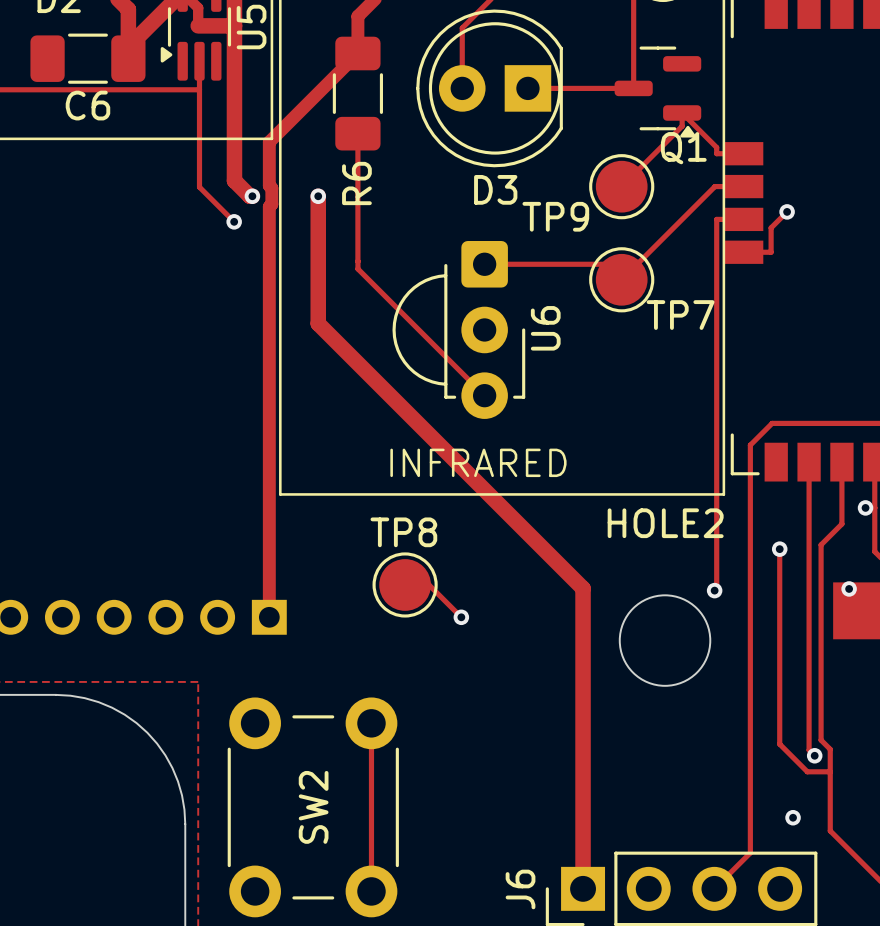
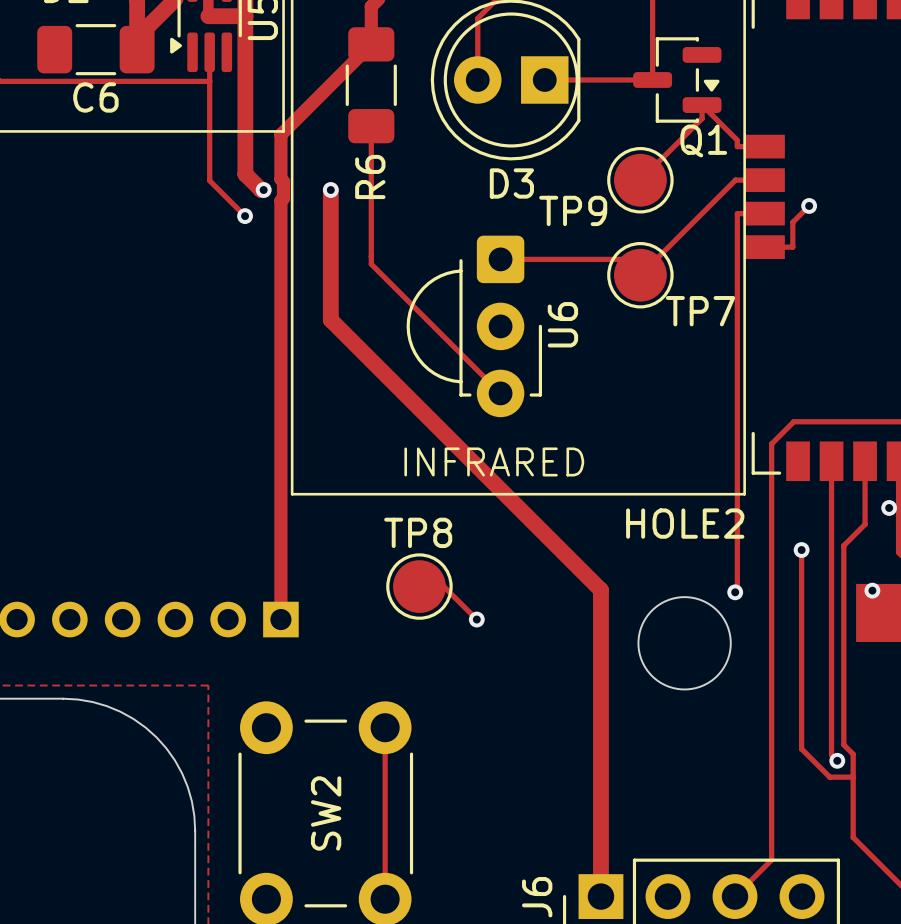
Q1 footprint: [614, 46, 702, 138] -> [633, 37, 722, 123]
via: (793, 817) -> none

